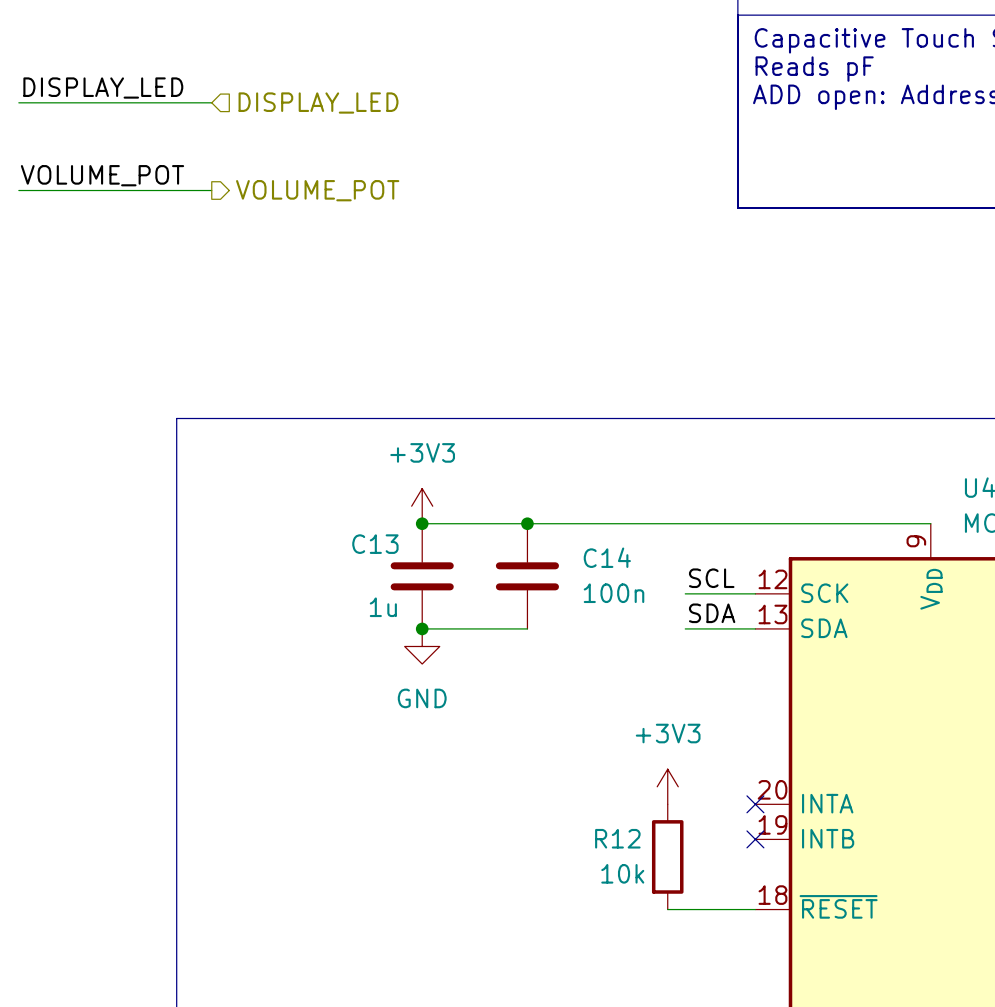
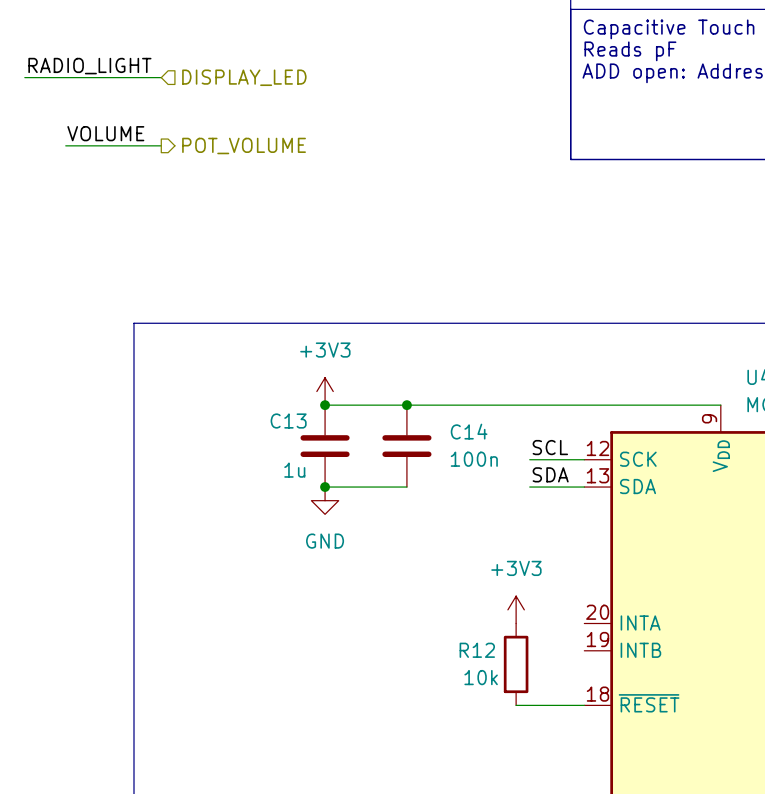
label: DISPLAY_LED (103, 88) -> none
label: none -> RADIO_LIGHT (89, 66)
wire: (18, 102) (36, 102) -> none
label: VOLUME_POT (102, 175) -> VOLUME (105, 133)
wire: (18, 190) (89, 190) -> none
hierarchical label: VOLUME_POT (317, 190) -> POT_VOLUME (244, 145)
no-connect mark: (755, 804) -> none
no-connect mark: (755, 839) -> none

